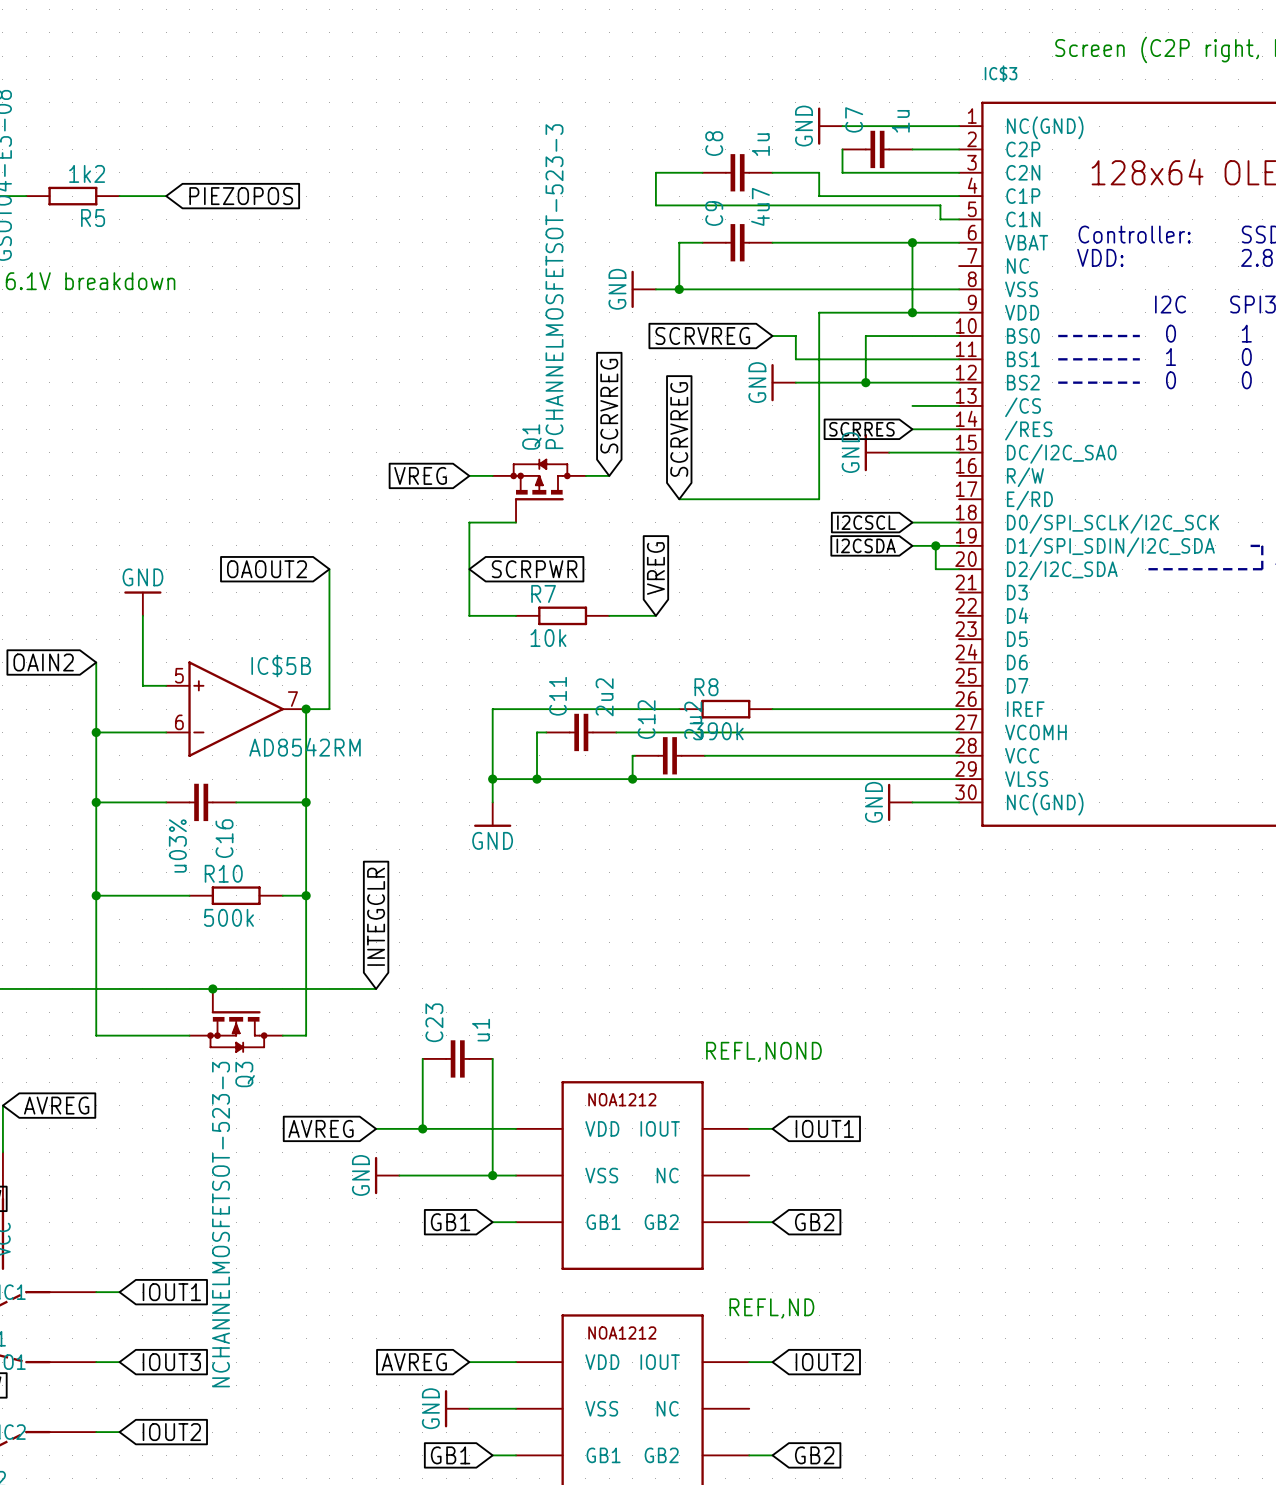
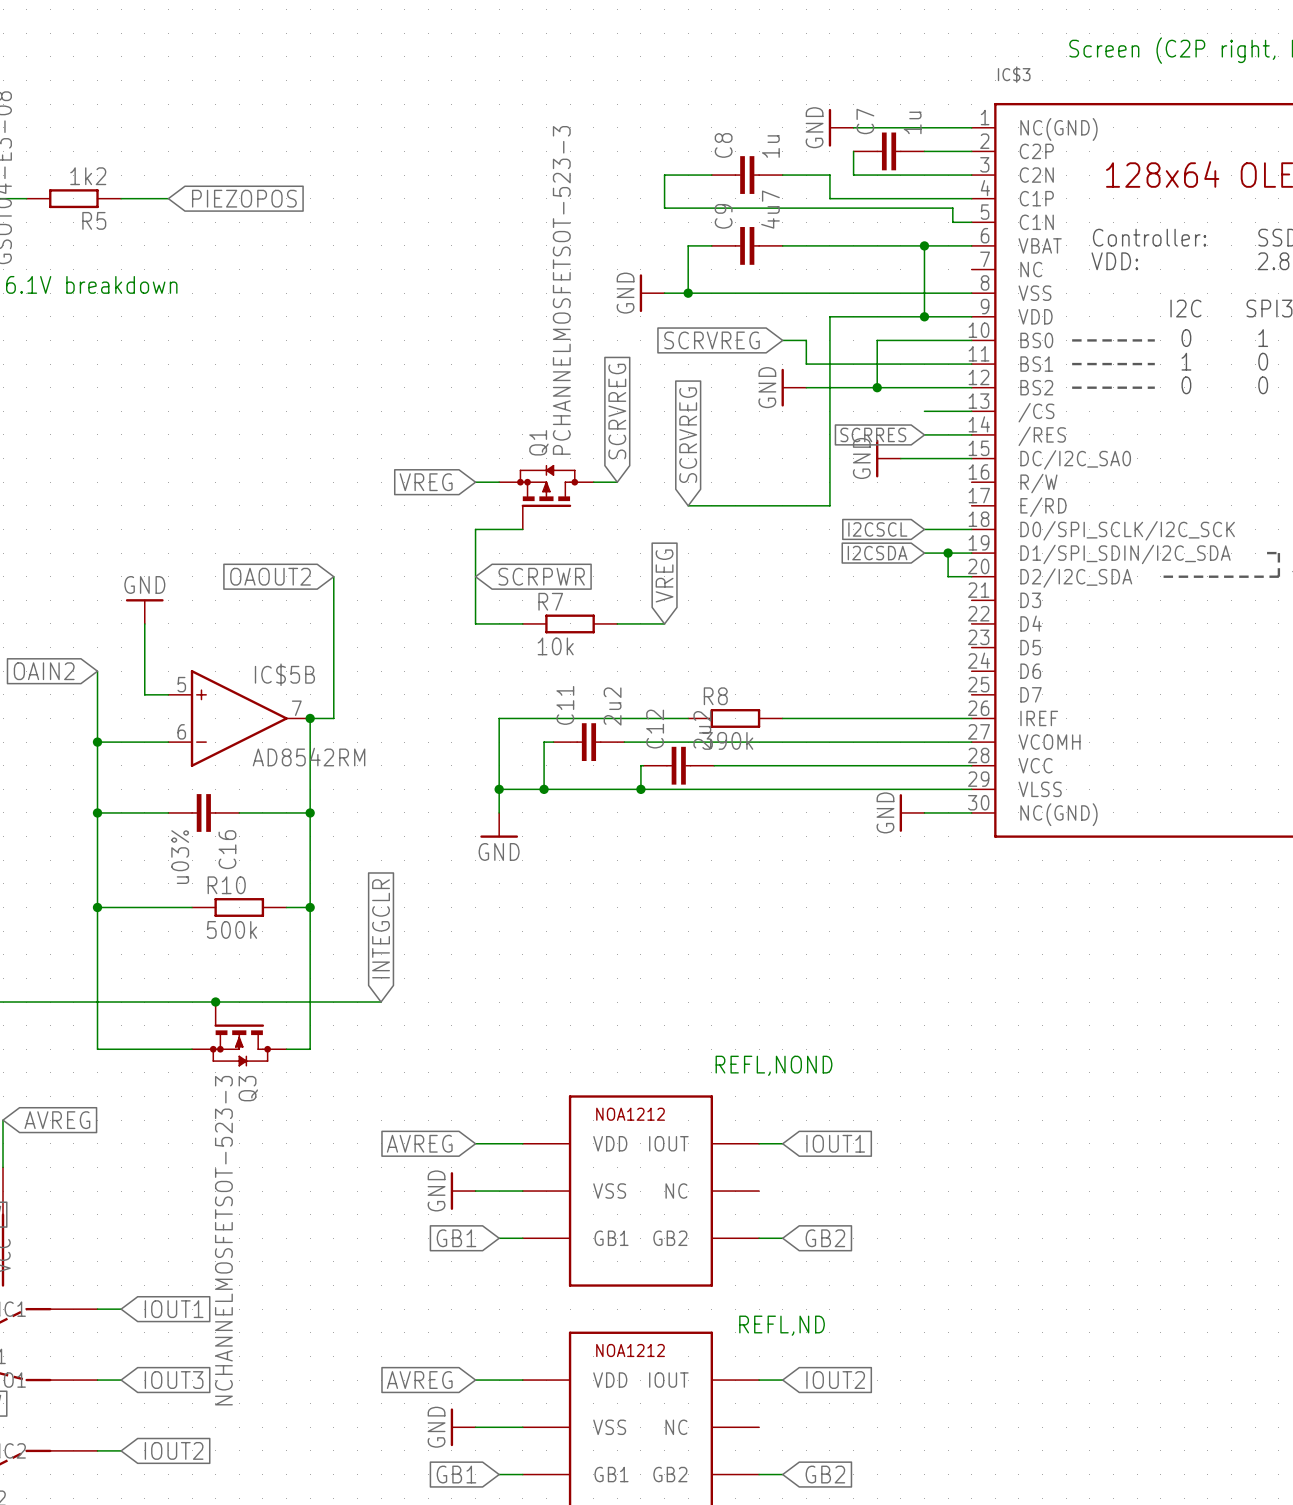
wire: (422, 1058) (422, 1128) -> none
C23: u1 (457, 1058) -> none
wire: (492, 1058) (492, 1175) -> none
global label position: AVREG (321, 1128) -> AVREG (419, 1143)
wire: (376, 1128) (469, 1128) -> none
junction: (422, 1128) -> none
power symbol position: GND (387, 1175) -> GND (463, 1191)
wire: (399, 1175) (469, 1175) -> none
junction: (492, 1175) -> none

